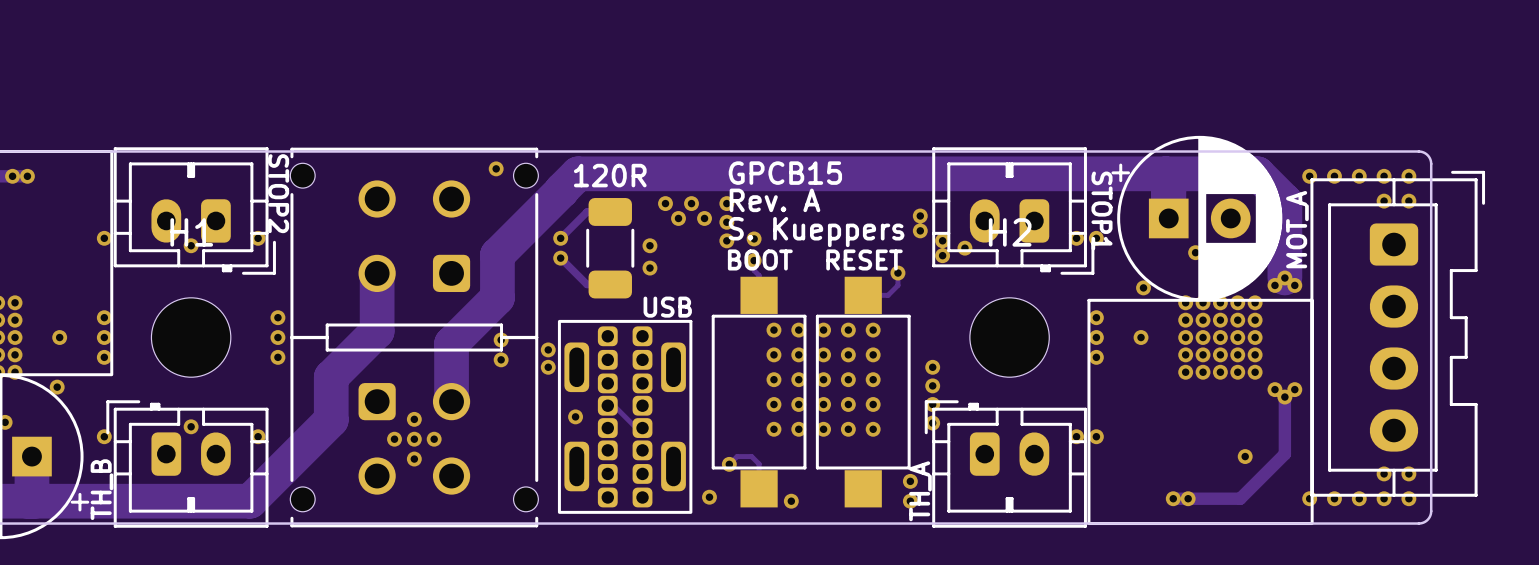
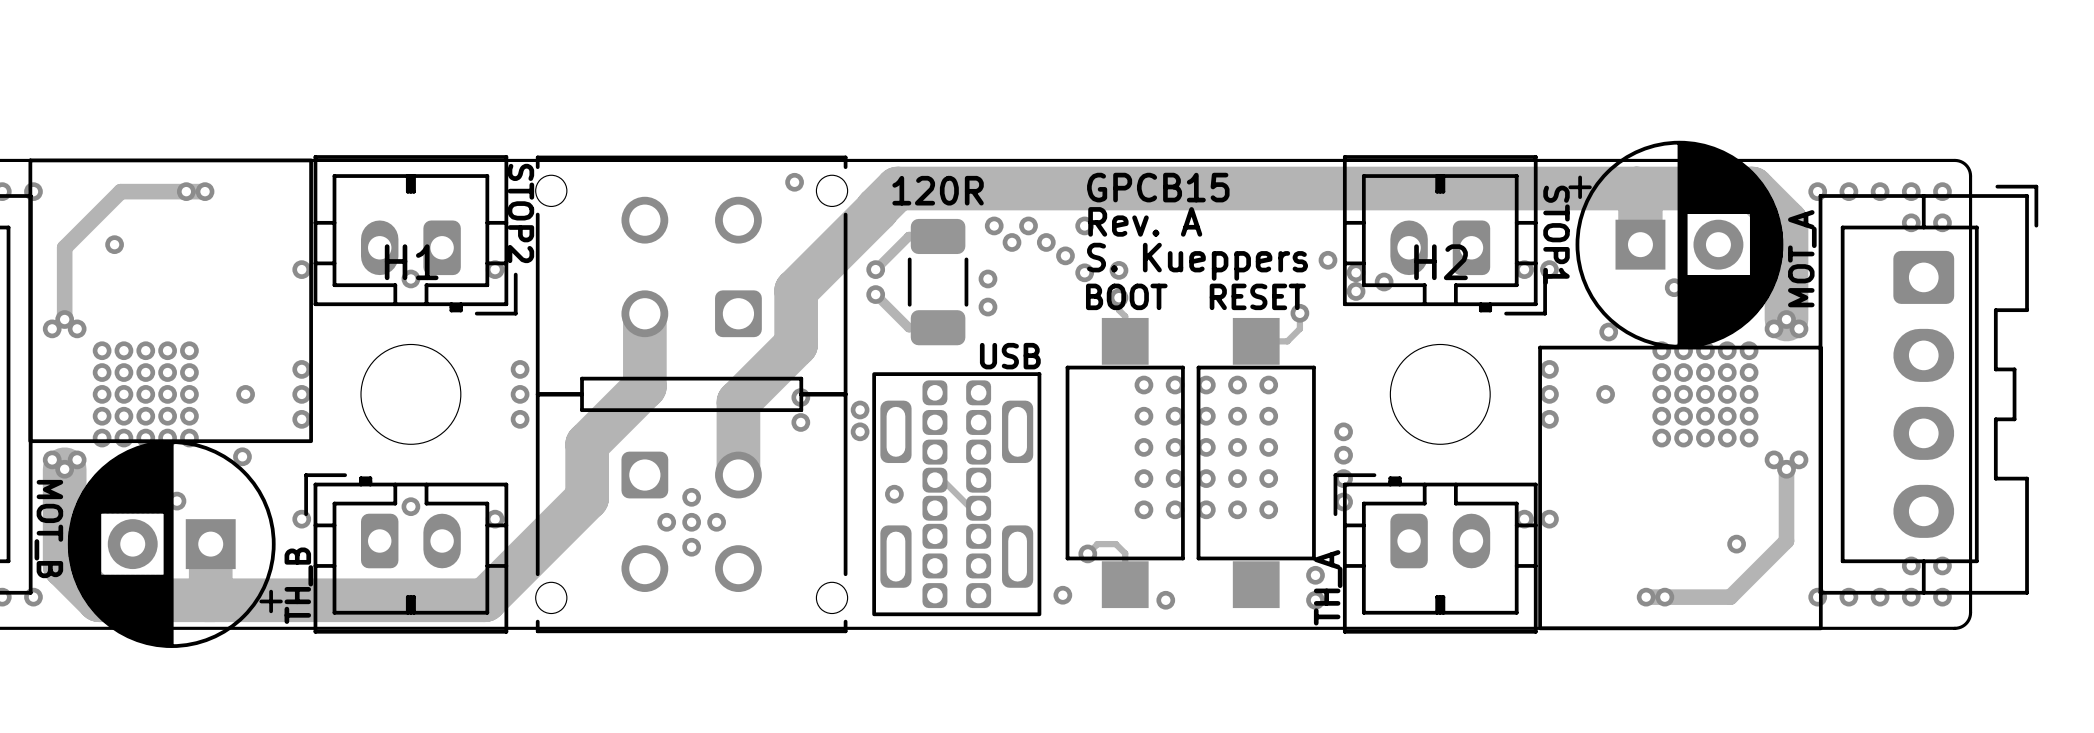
via: none -> (994, 225)
via: (665, 203) -> none
via: none -> (1028, 225)
via: (691, 203) -> none
via: (920, 215) -> none
via: none -> (1012, 242)
via: none -> (1046, 242)
via: (678, 218) -> none
via: (704, 218) -> none
via: (726, 222) -> none
via: none -> (1065, 255)

